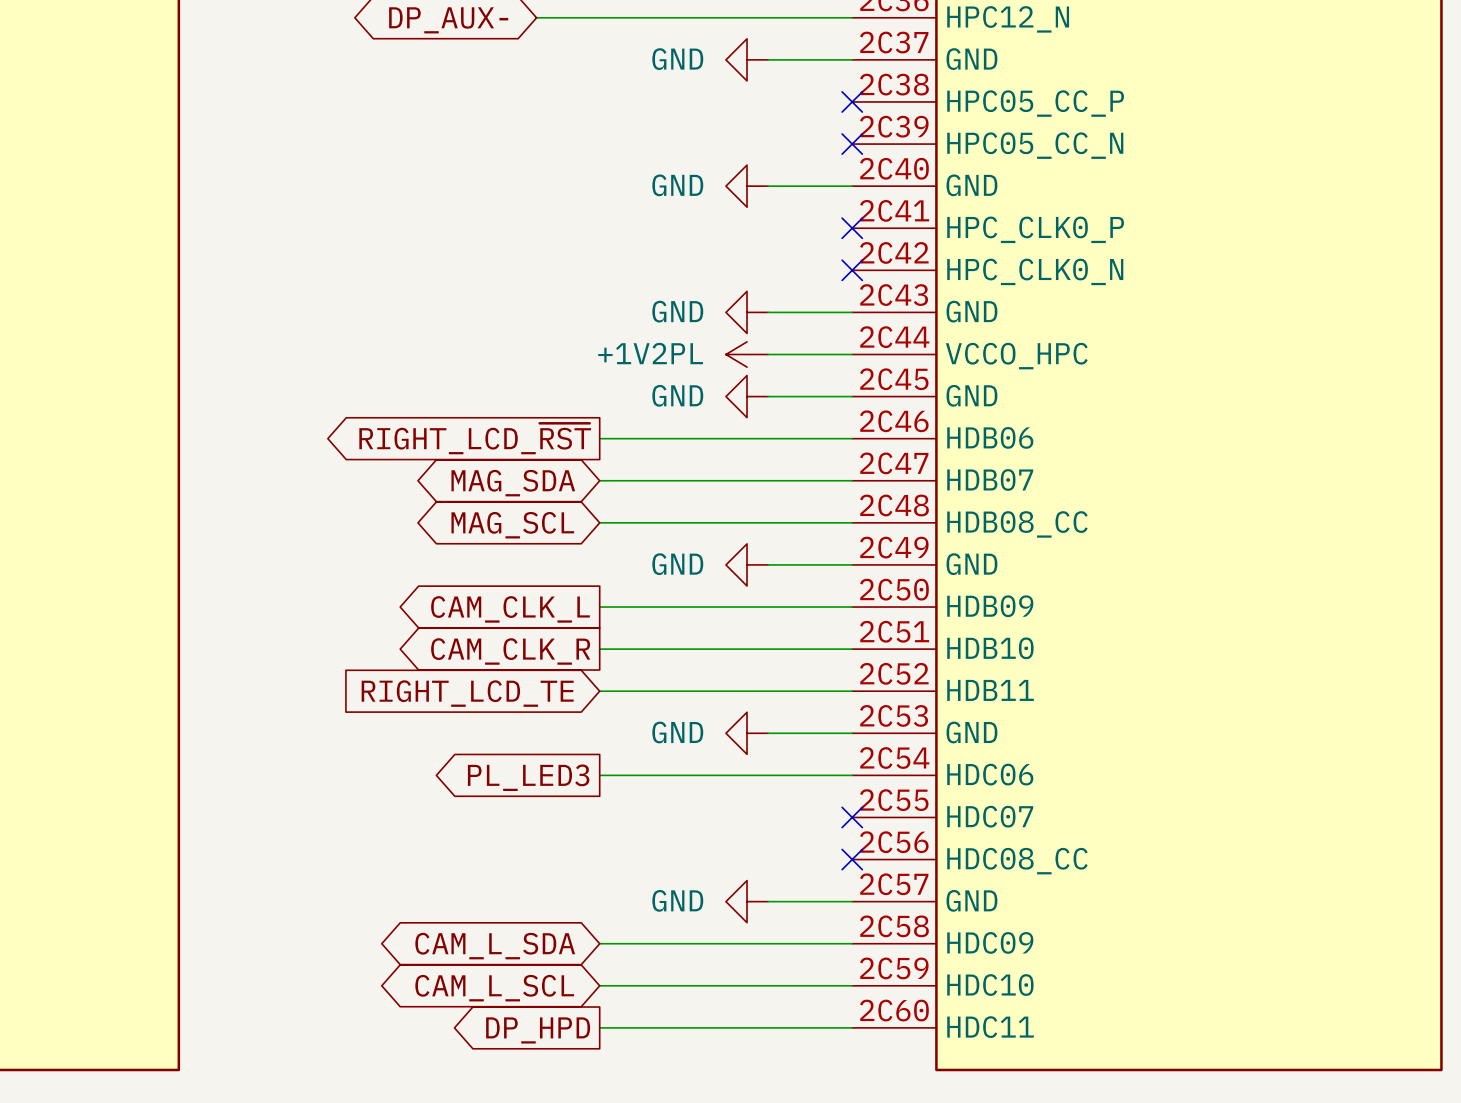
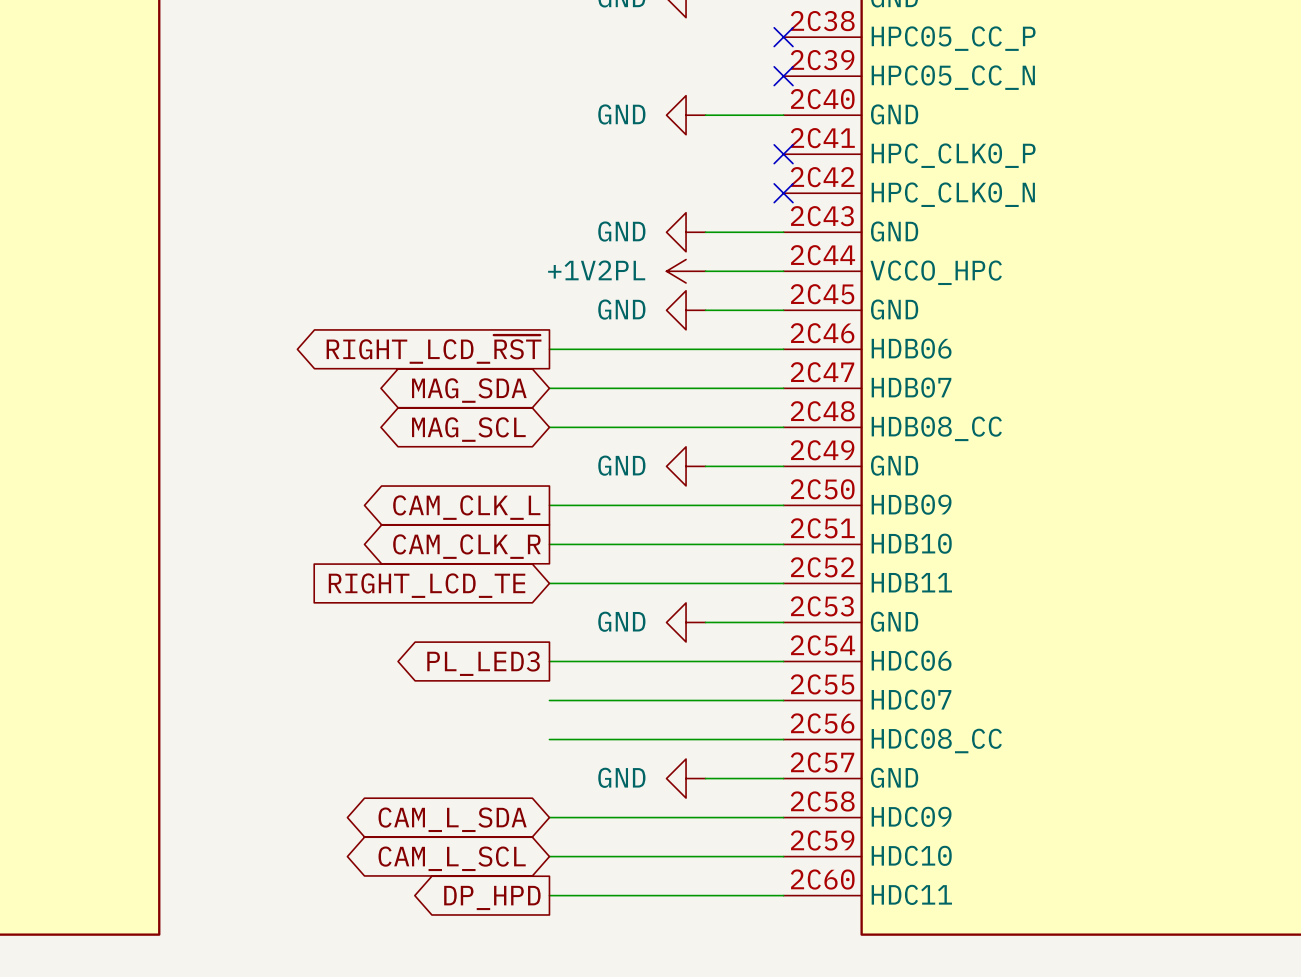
wire: none -> (549, 700) (783, 700)
no-connect mark: (852, 817) -> none
wire: none -> (549, 739) (783, 739)
no-connect mark: (852, 859) -> none

